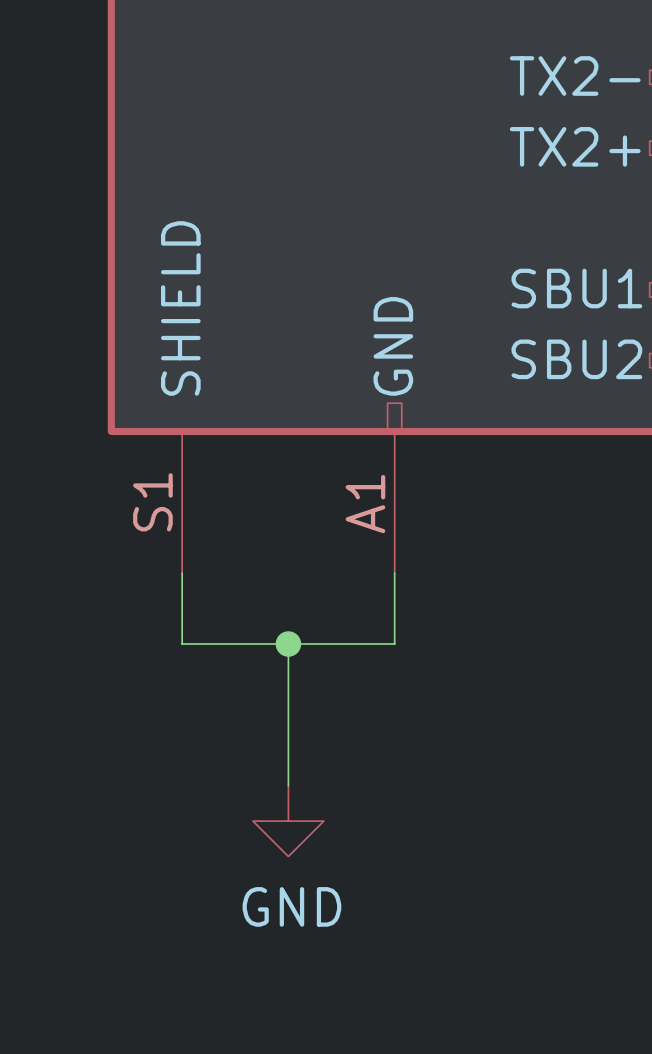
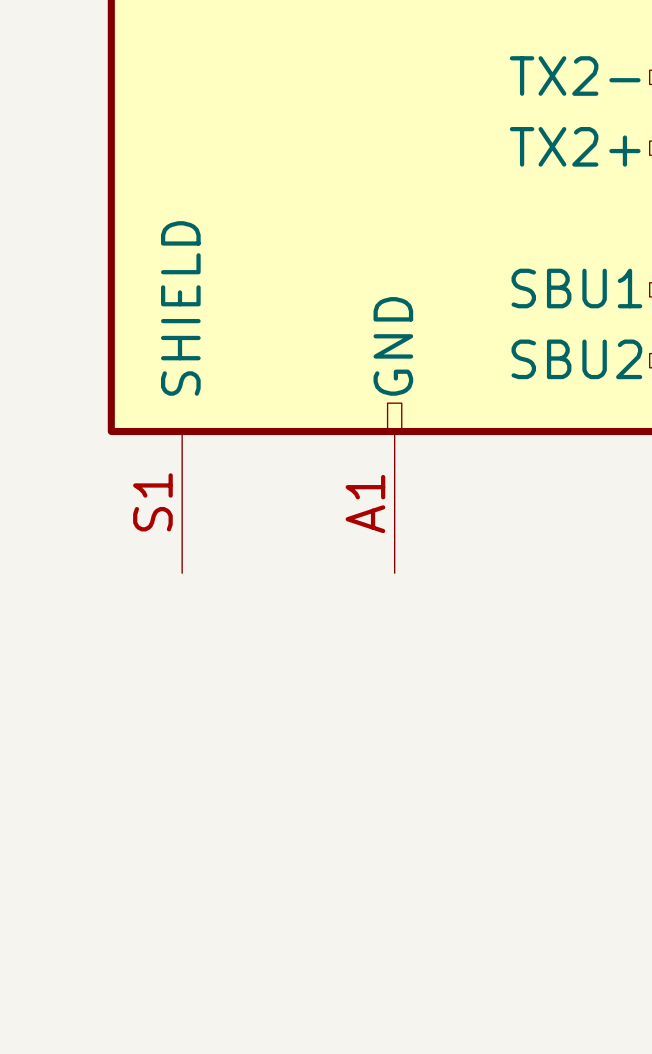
wire: (182, 573) (182, 644) (394, 644) (394, 573) -> none
wire: (288, 644) (288, 785) -> none
junction: (288, 644) -> none
power symbol: GND (288, 821) -> none

